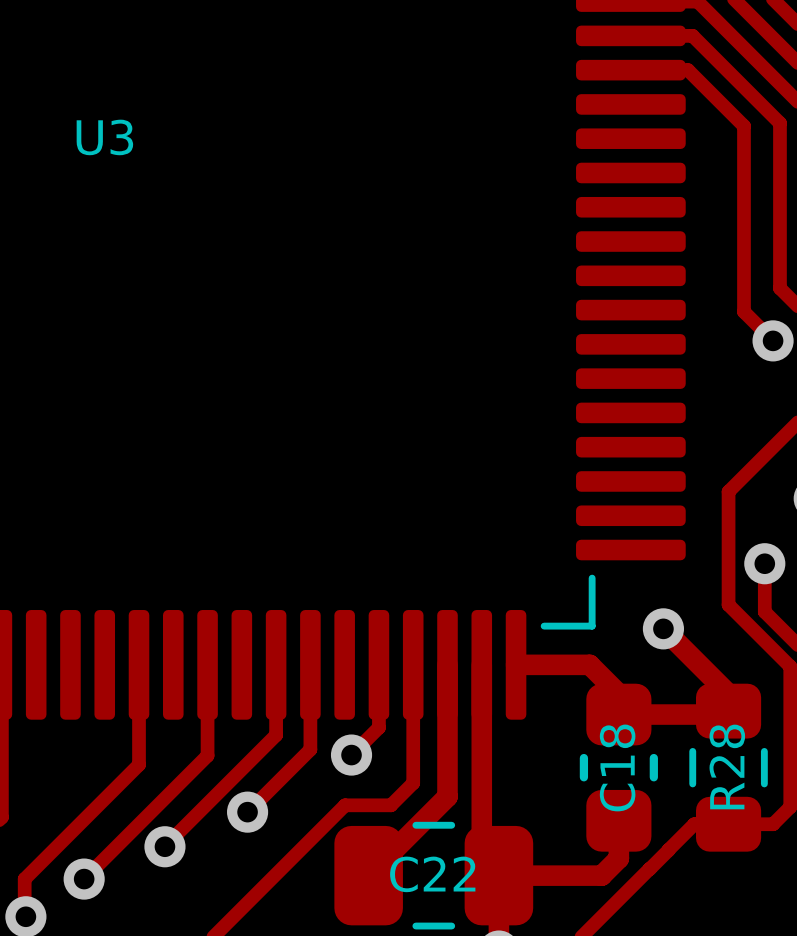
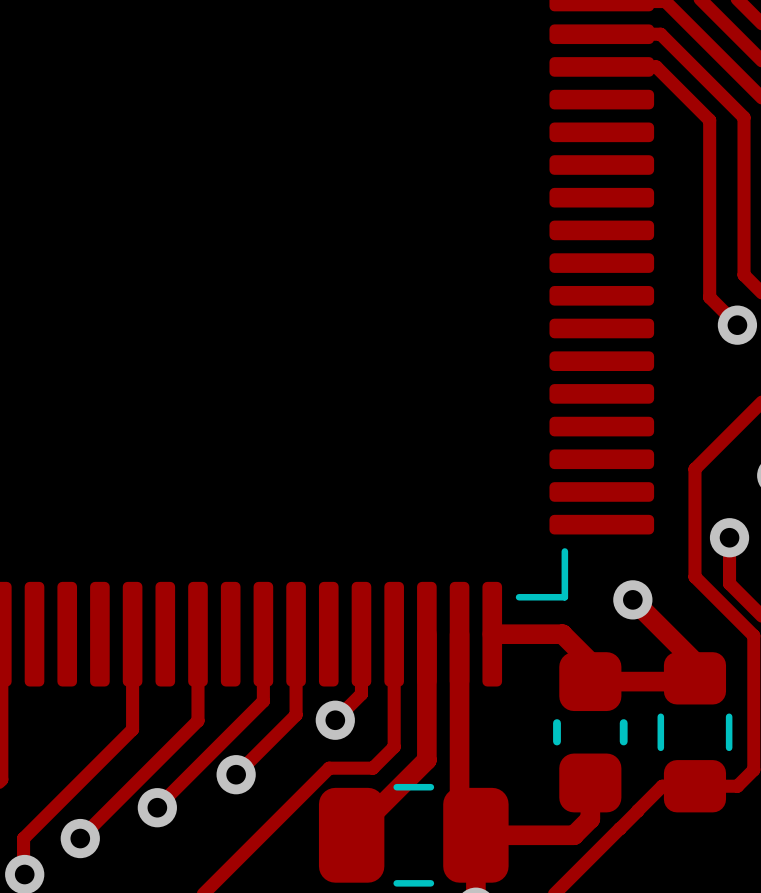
U3 name: U3 (104, 137) -> none
R28 name: R28 (727, 766) -> none
C18 name: C18 (617, 767) -> none
C22 name: C22 (432, 874) -> none

